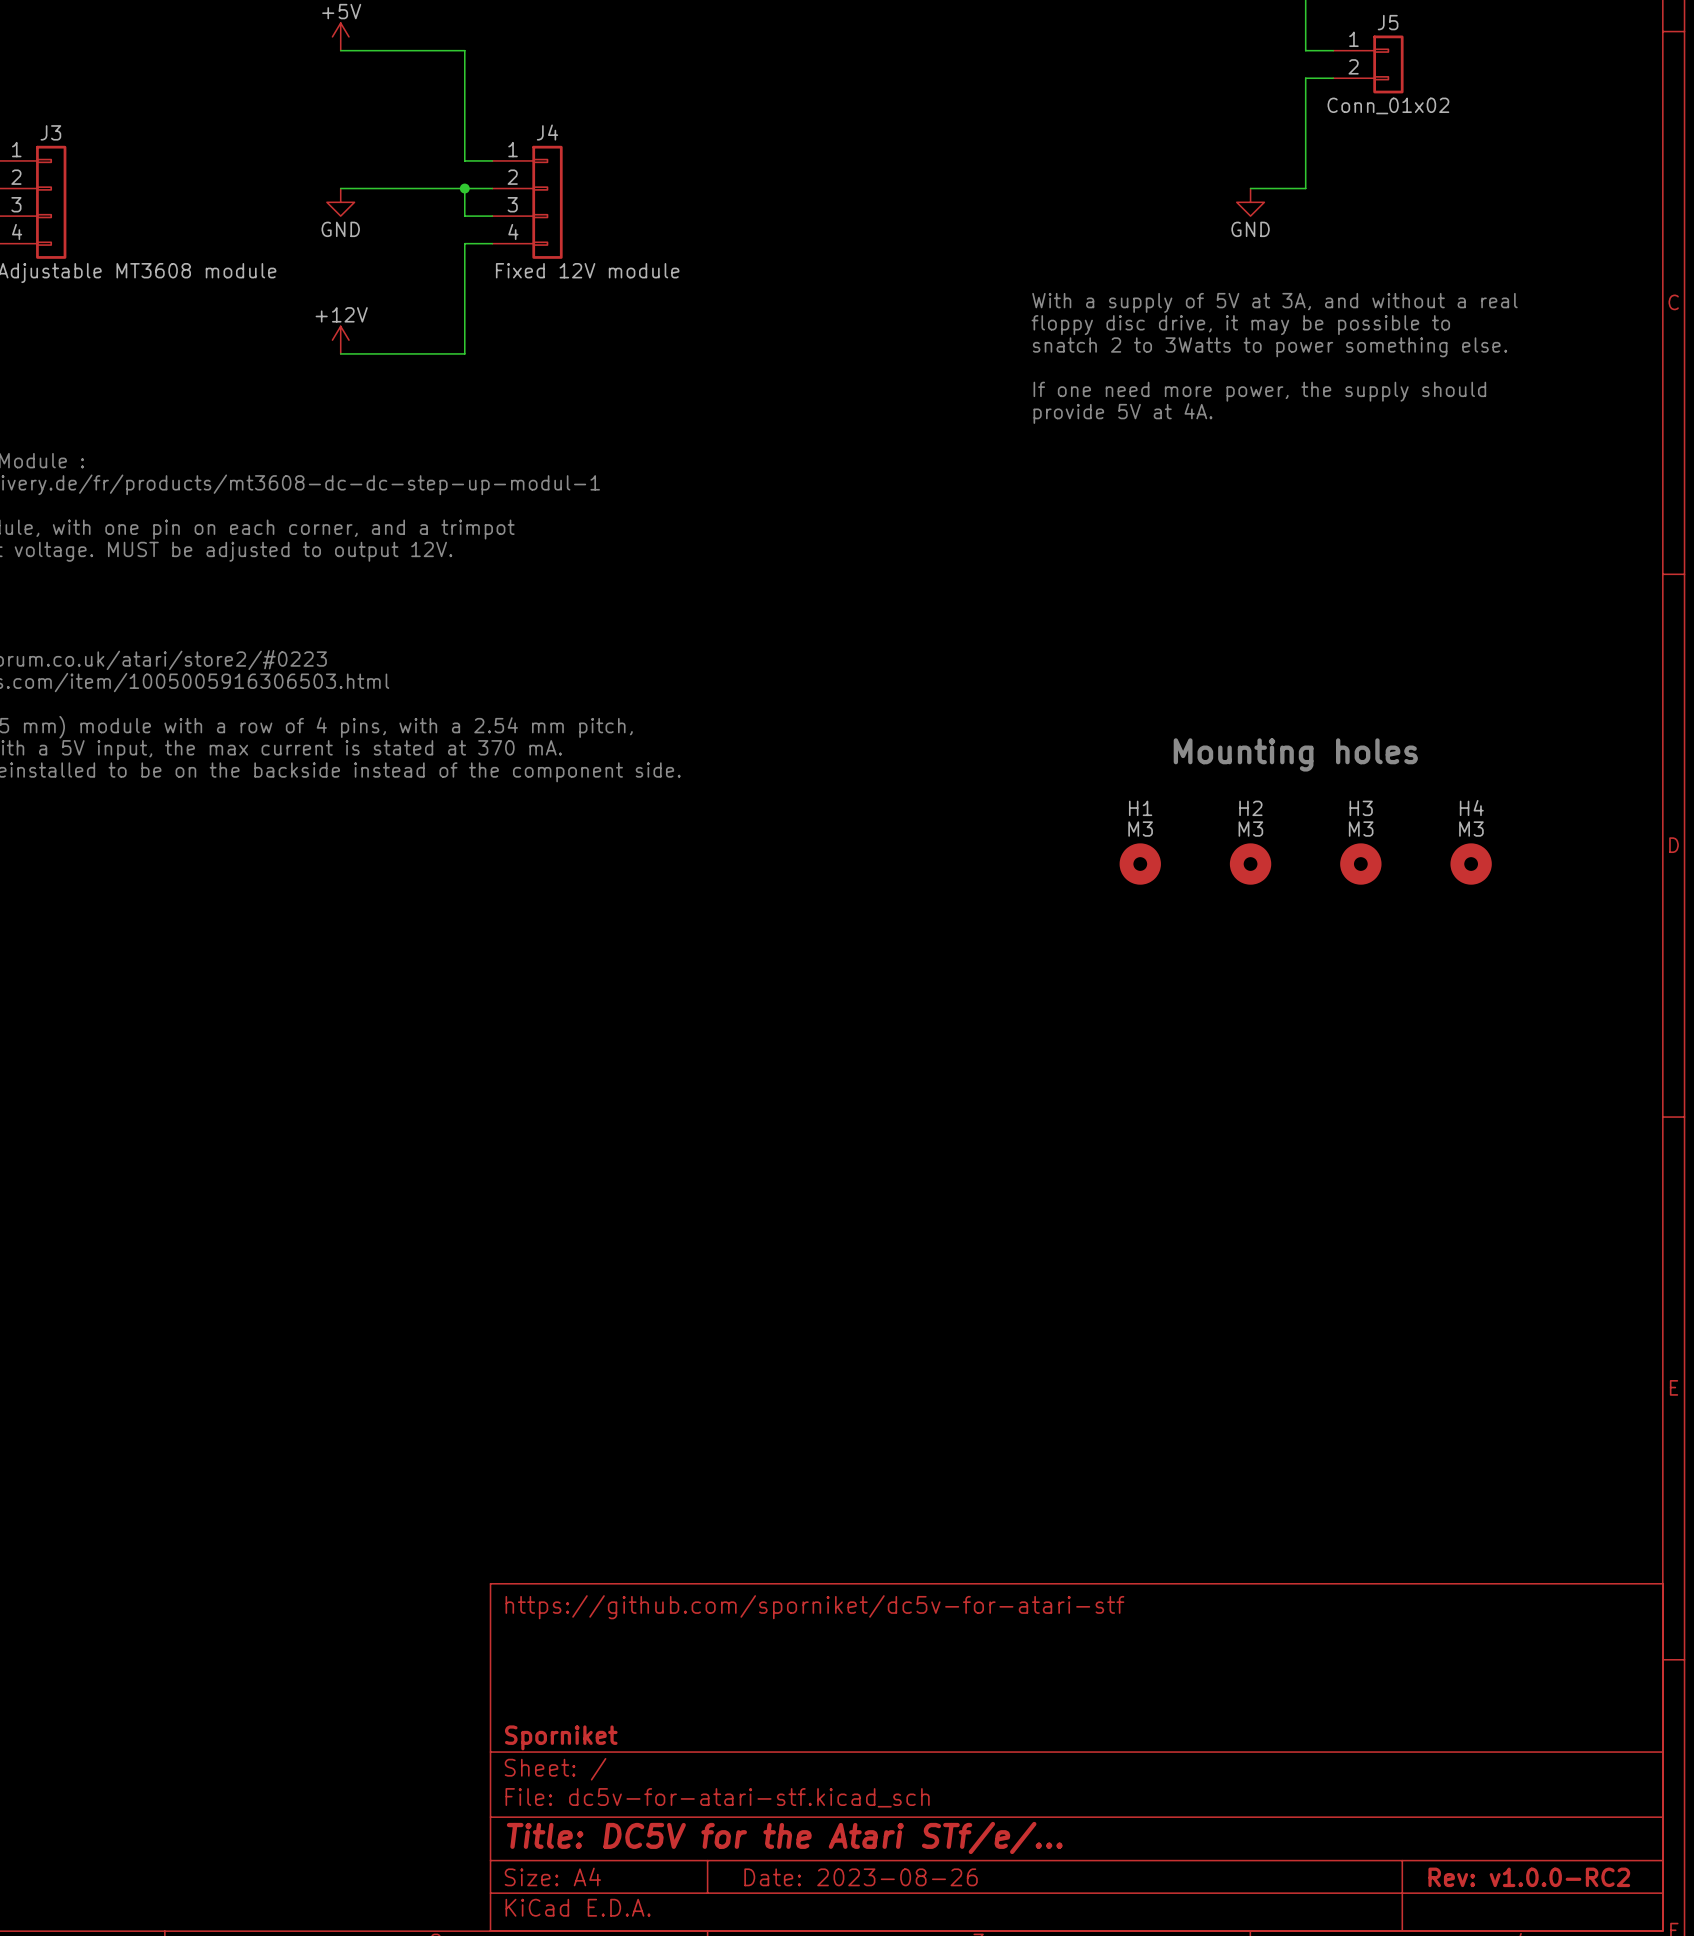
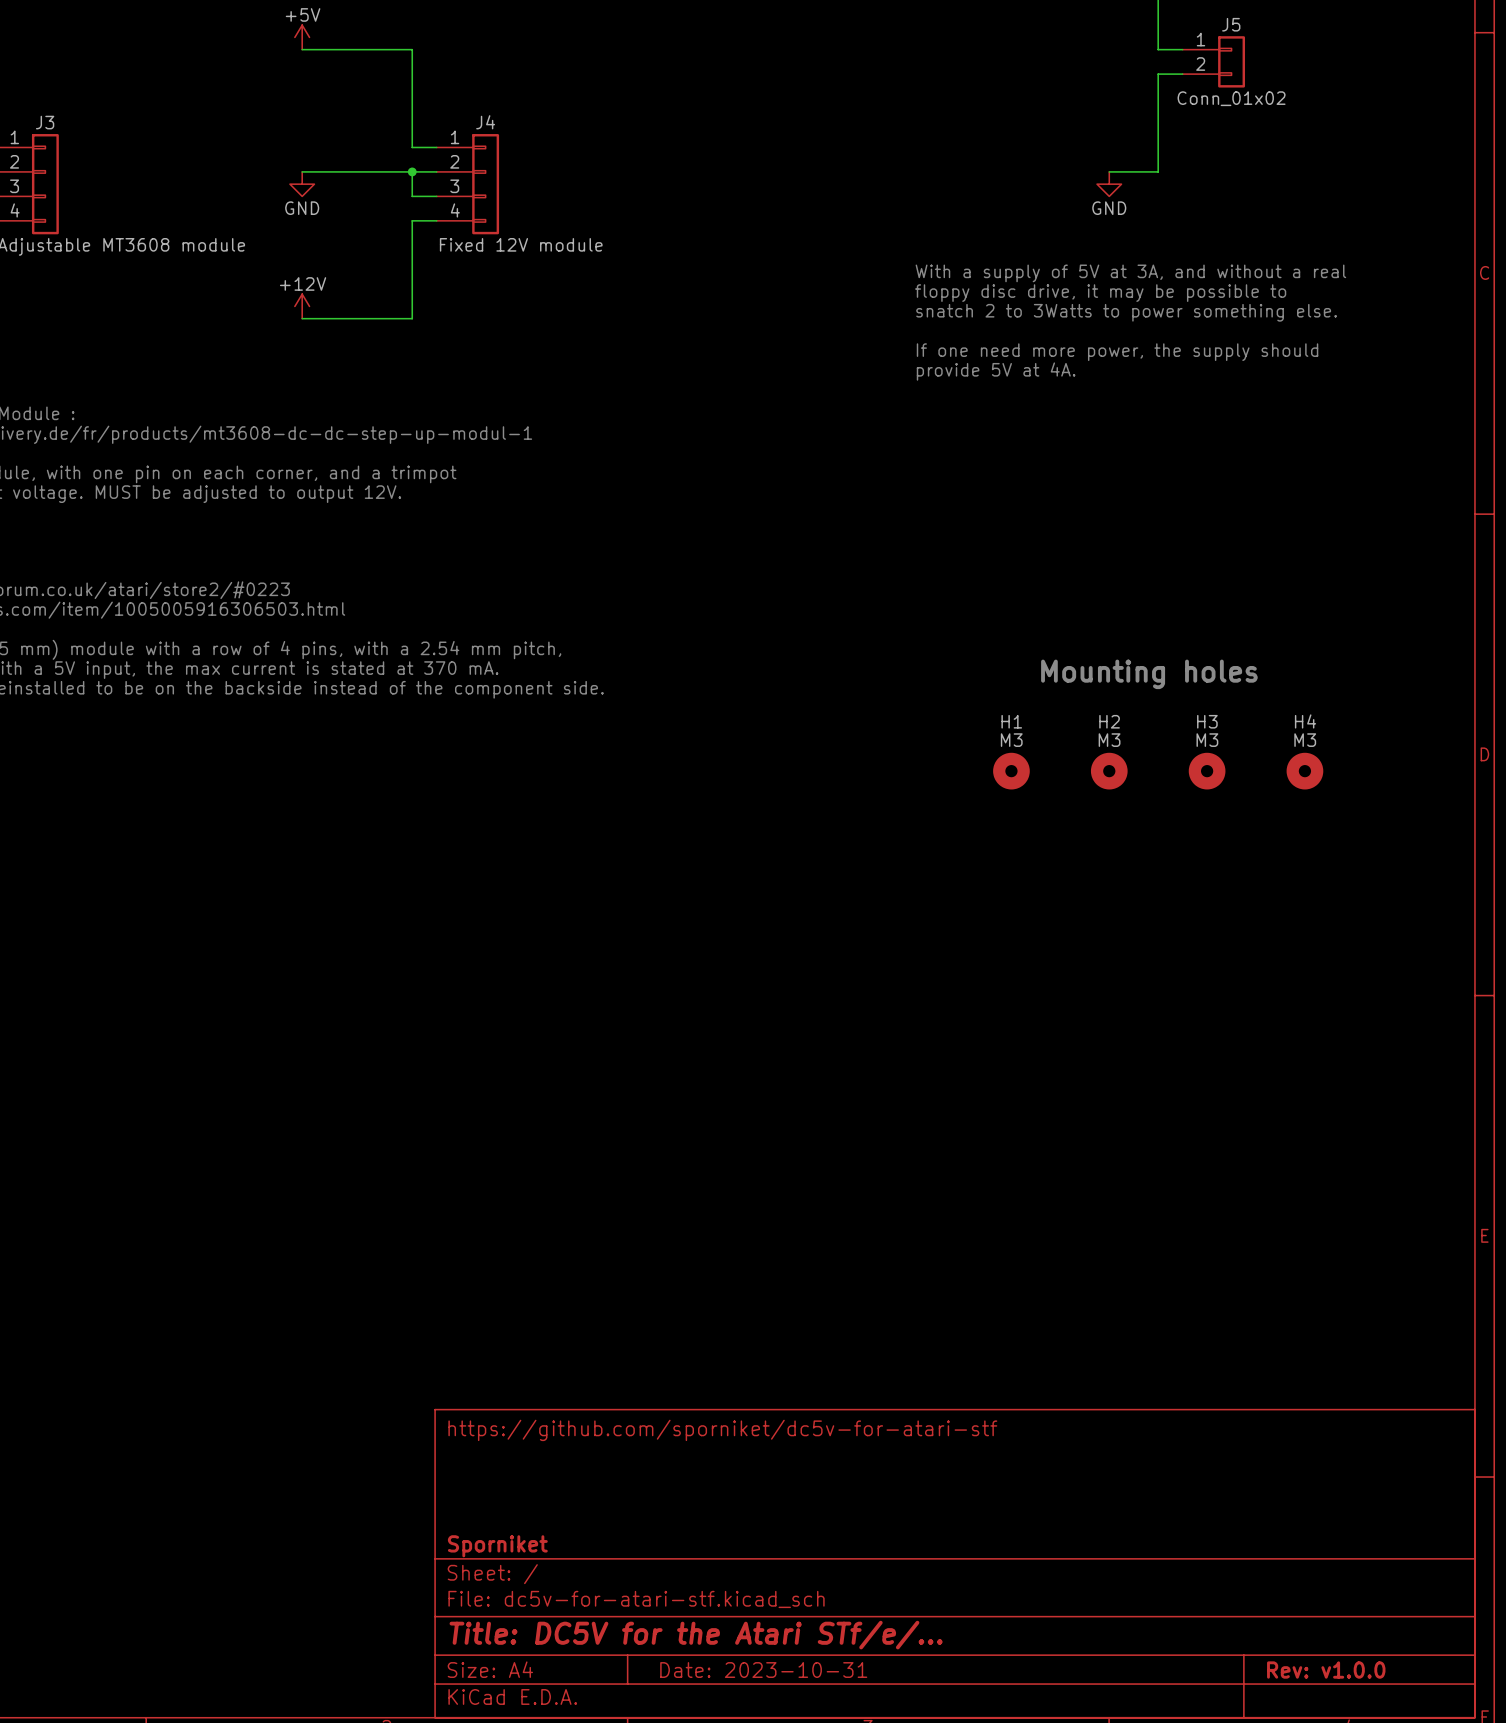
title block: Date: 2023-08-26 (861, 1877) -> Date: 2023-10-31 (763, 1670)
title block: Rev: v1.0.0-RC2 (1529, 1877) -> Rev: v1.0.0 (1326, 1670)

